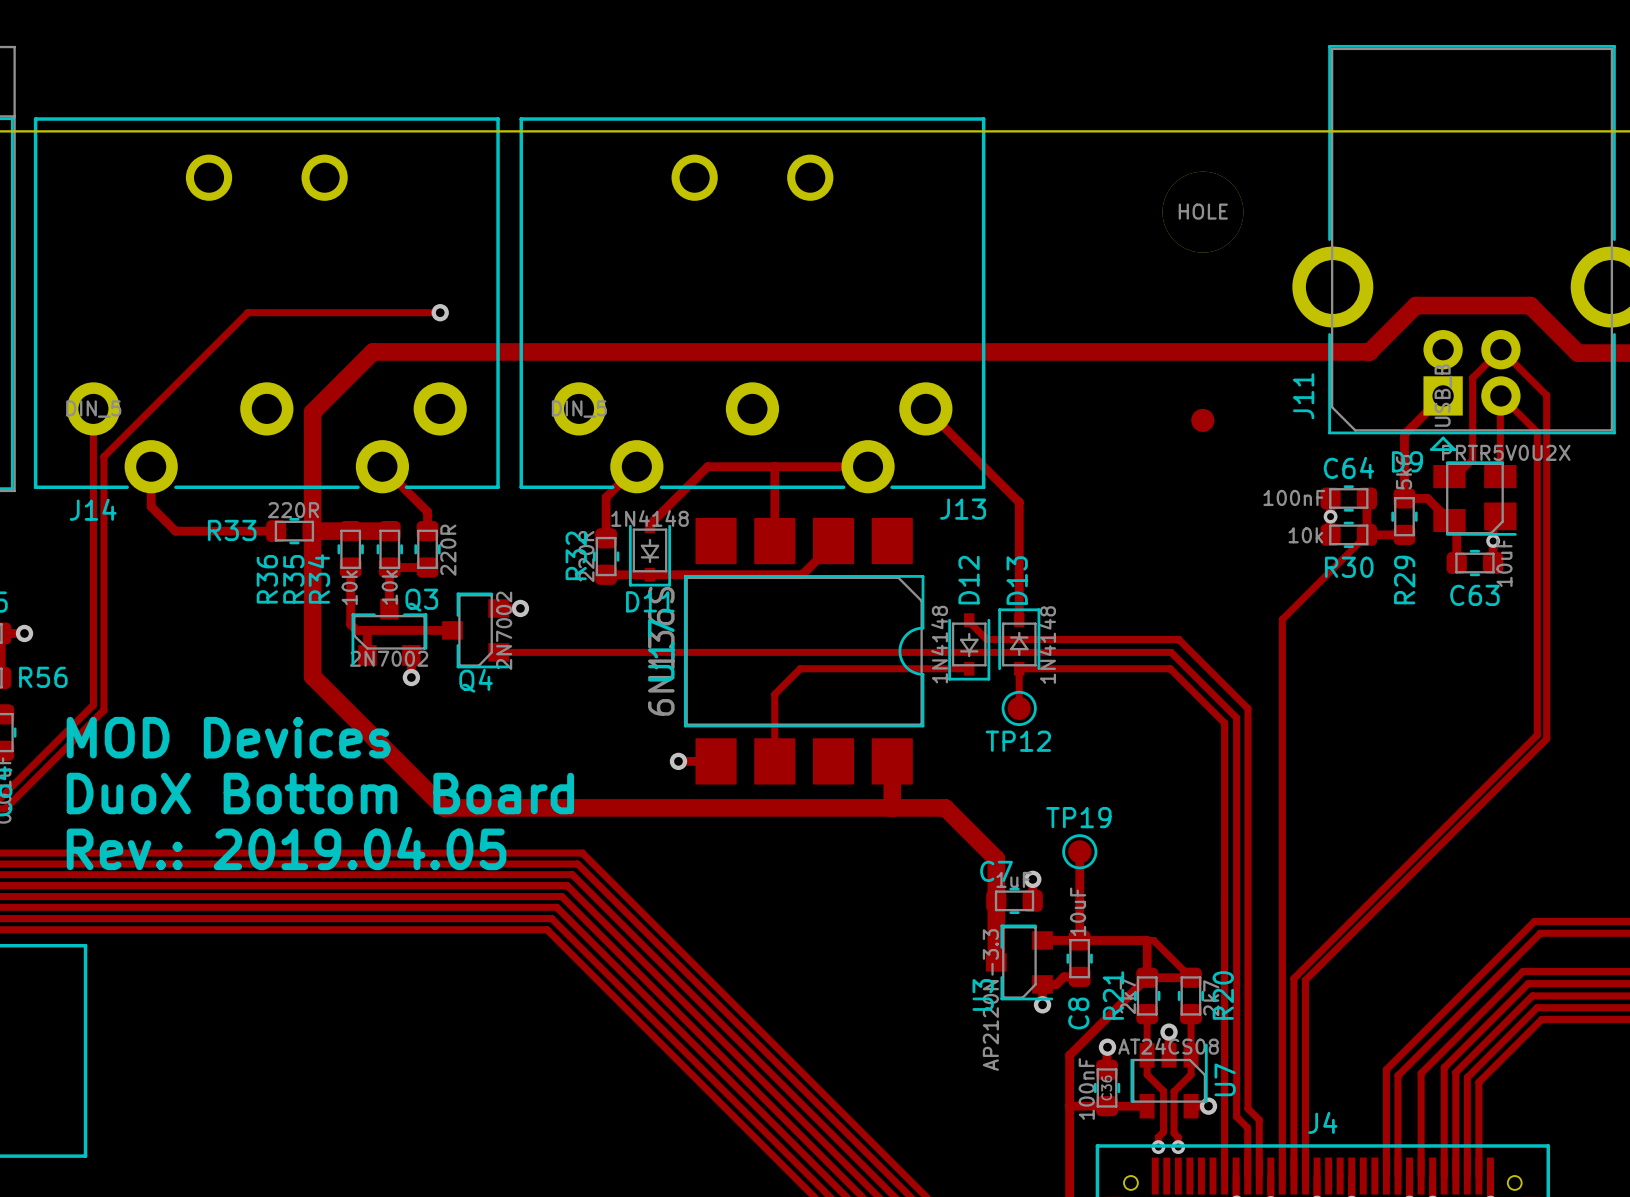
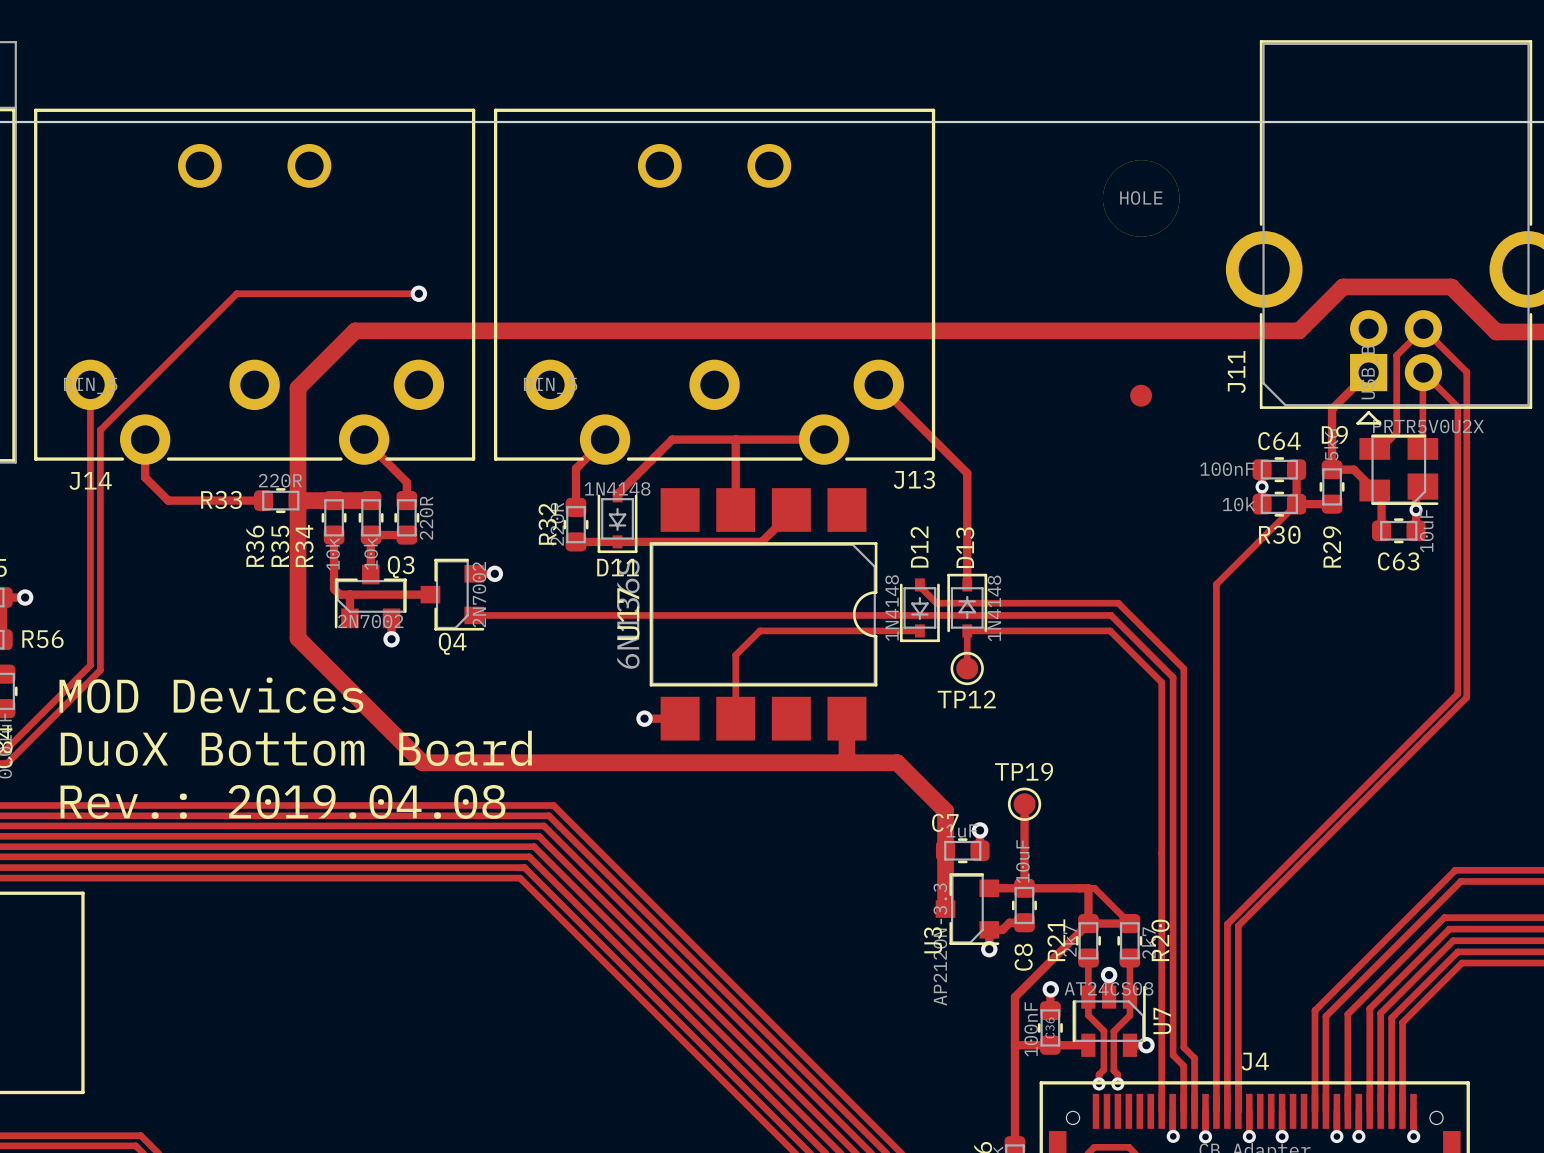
text: Rev.: 2019.04.05 (286, 848) -> Rev.: 2019.04.08 (283, 801)

